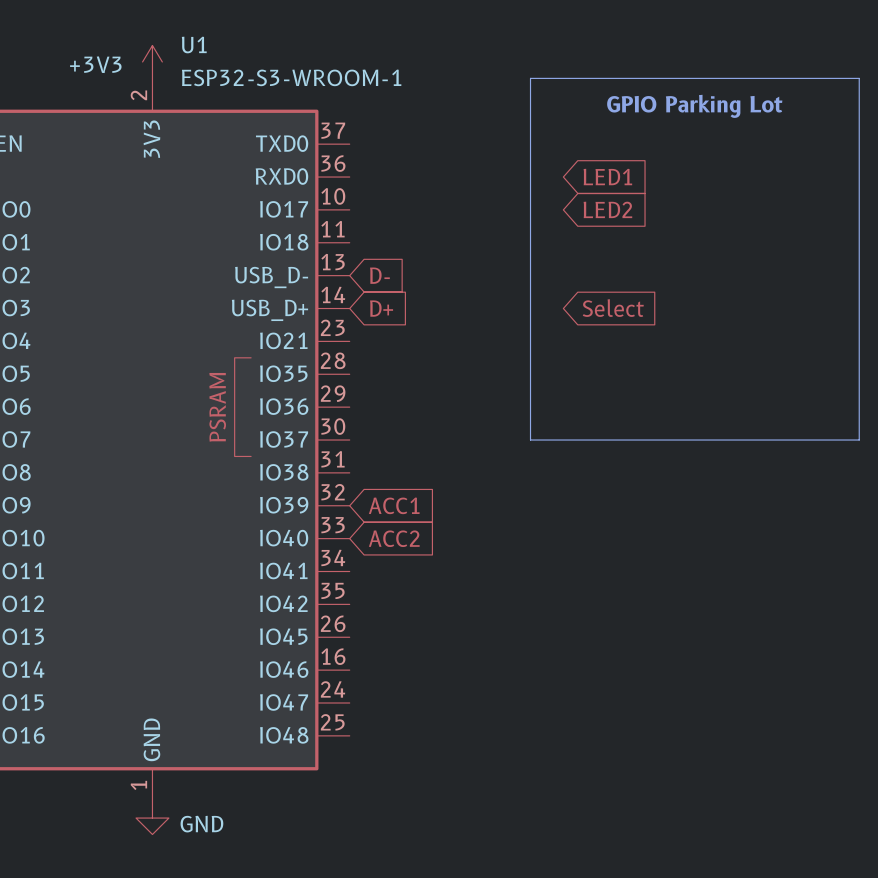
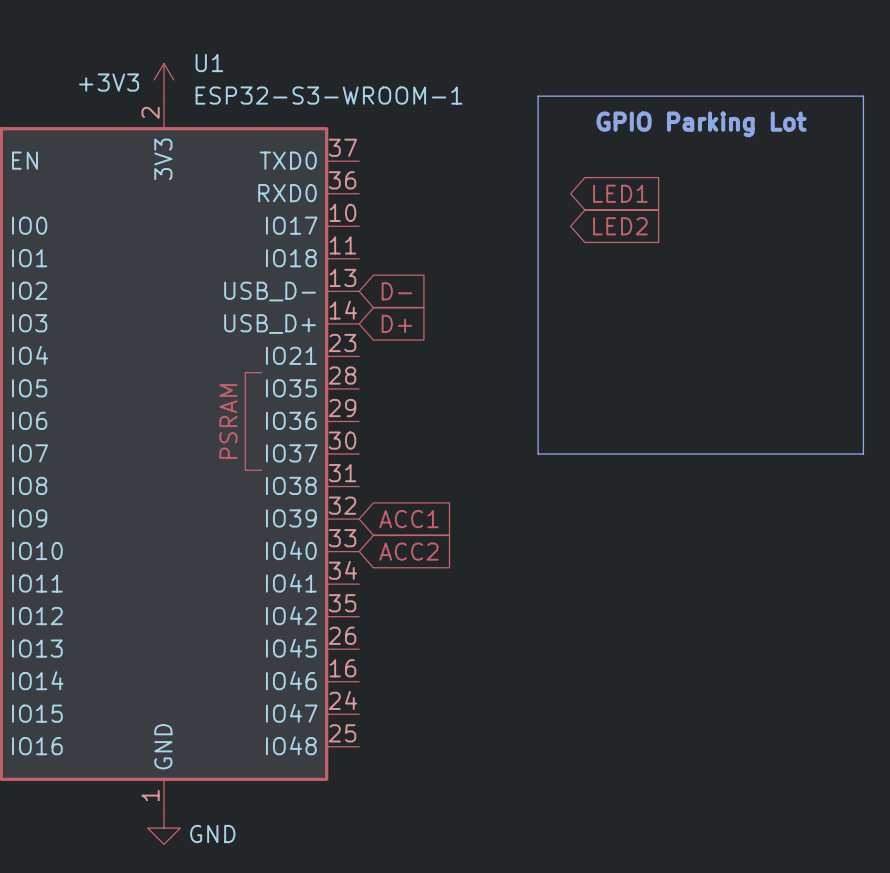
global label: Select (613, 308) -> none

